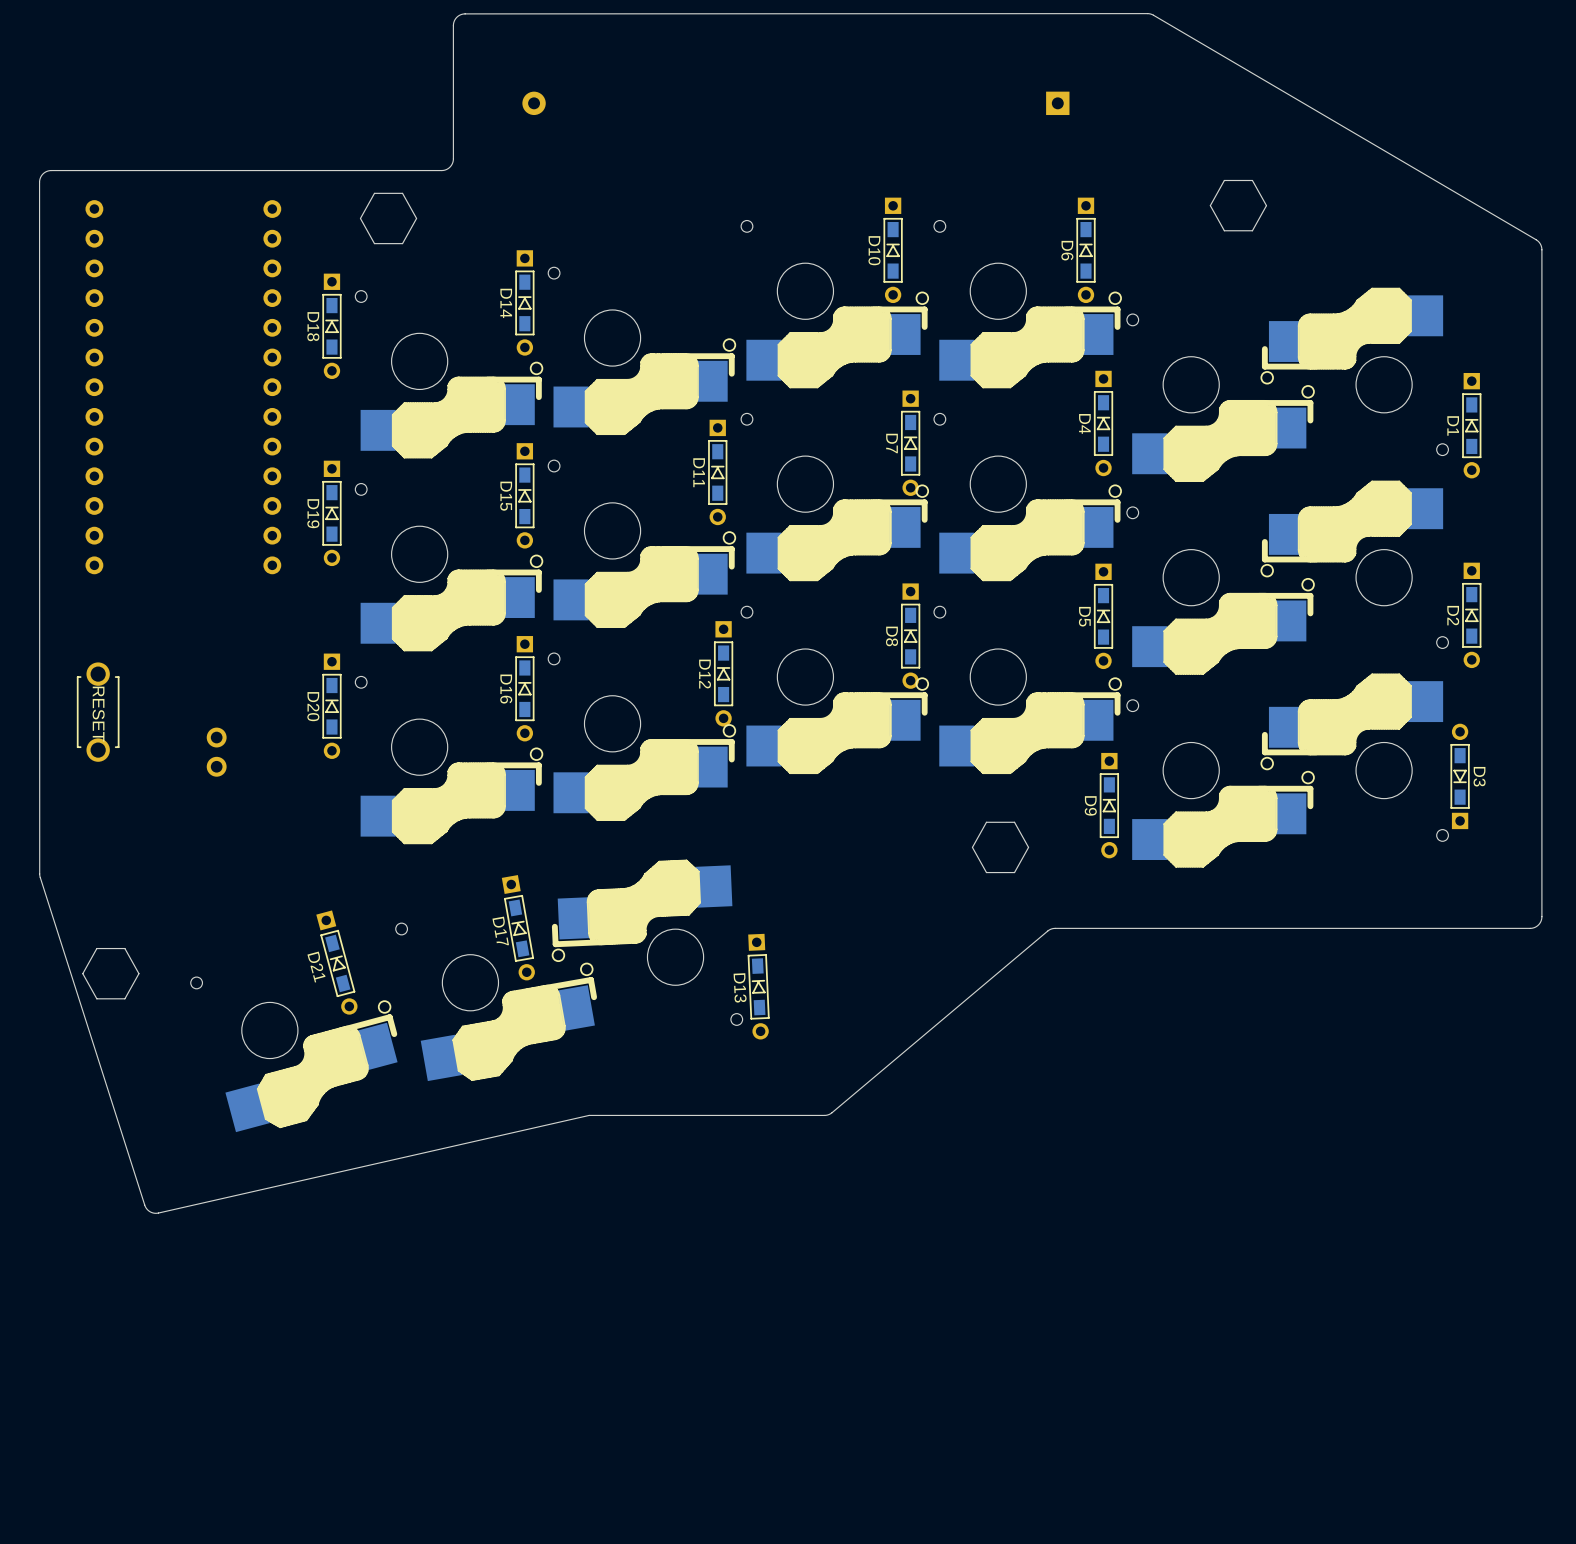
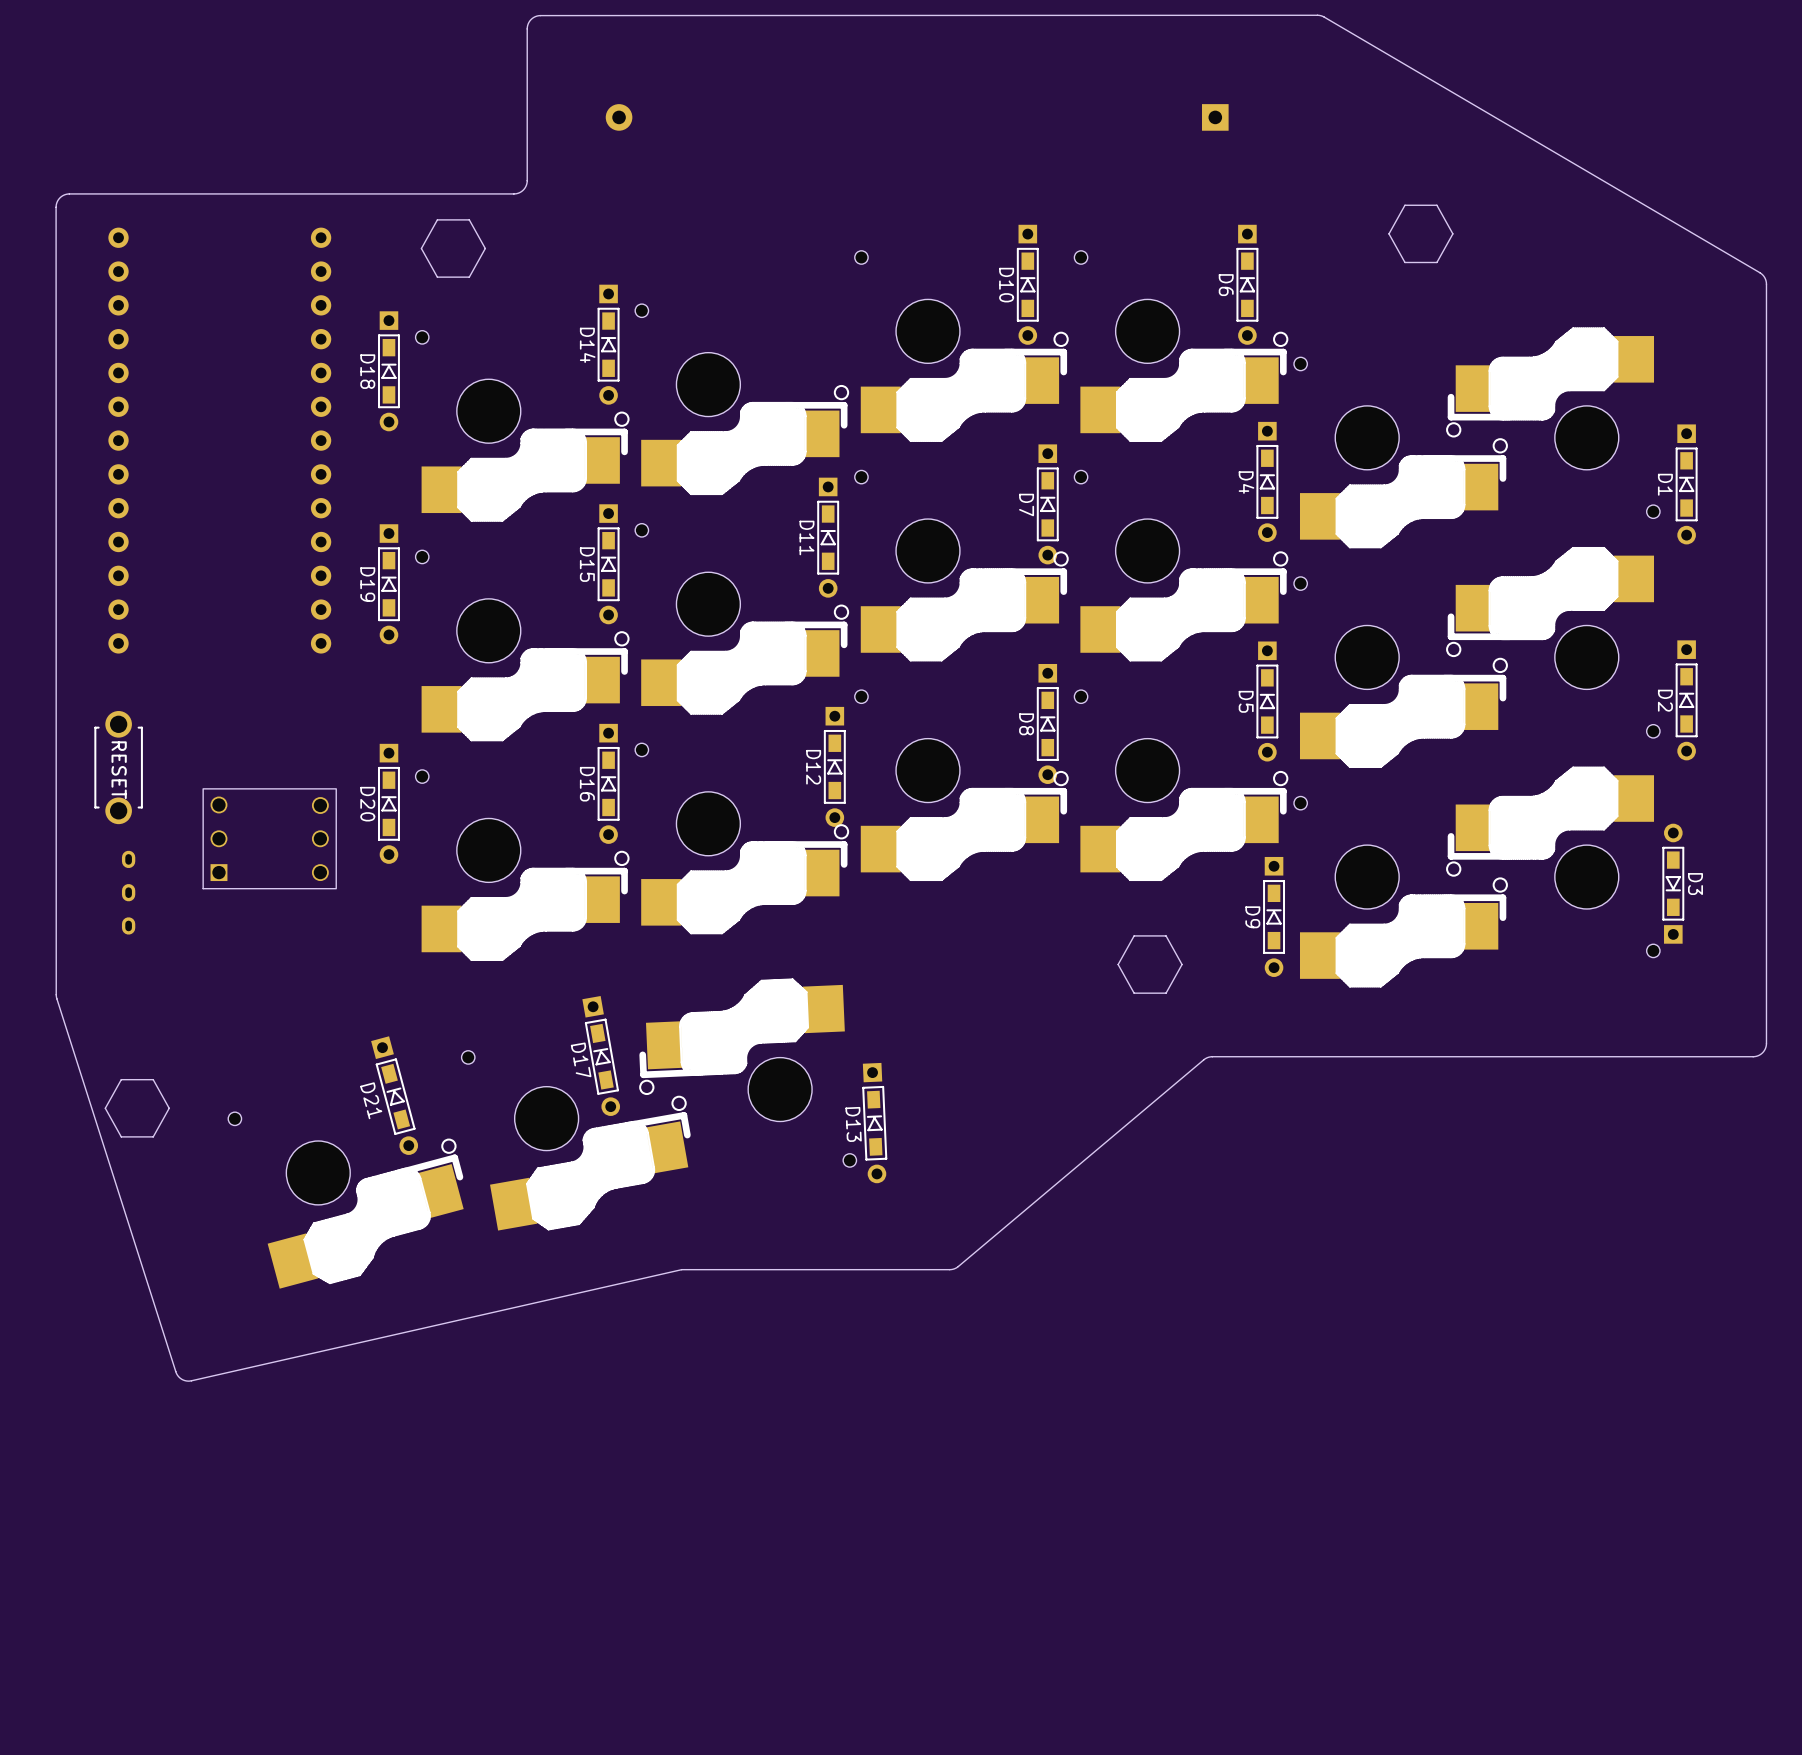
part position: (98, 712) -> (118, 767)
part: none -> (269, 838)
part: (216, 752) -> none
part: none -> (128, 892)

